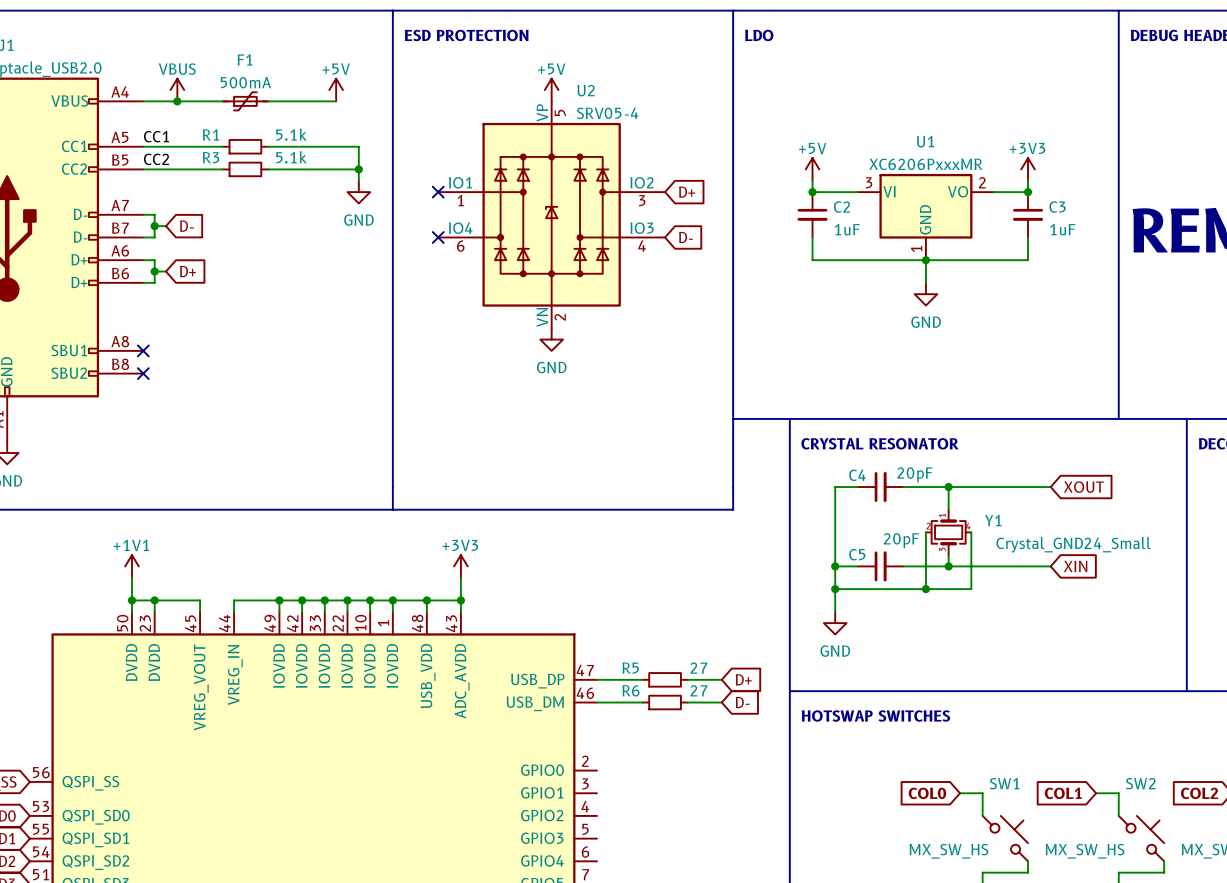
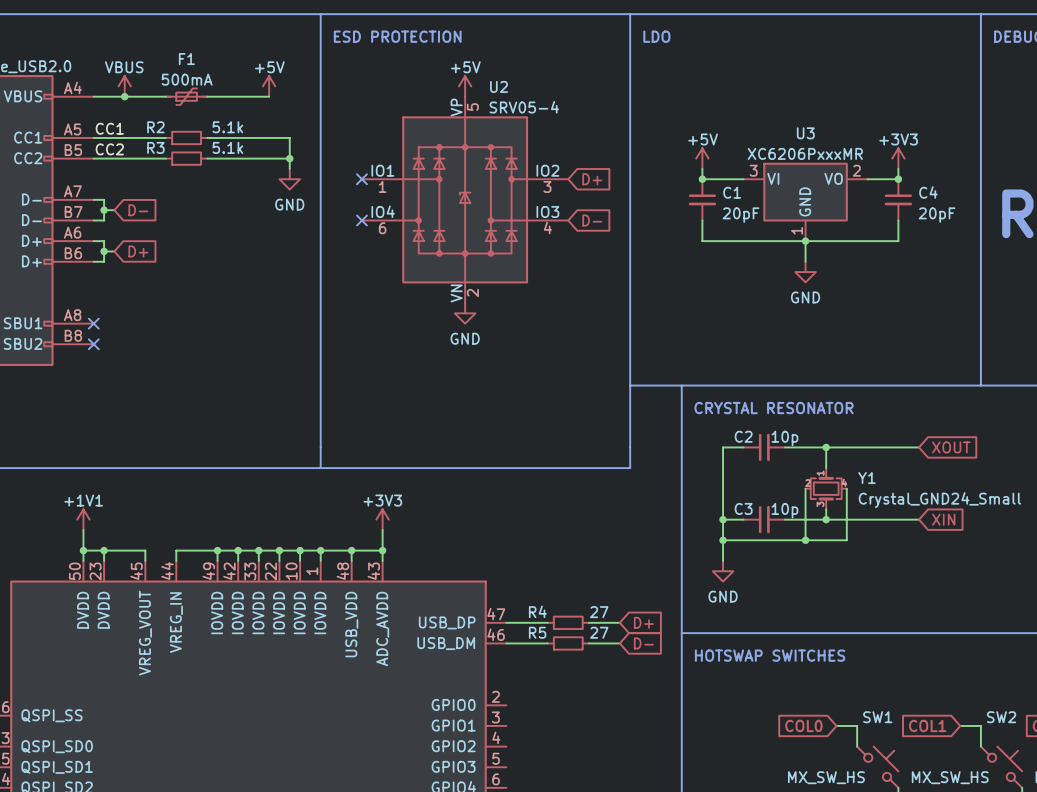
R1 name: R1 (211, 134) -> R2 (155, 127)
U1 name: U1 (925, 141) -> U3 (805, 133)
C2 name: C2 (842, 207) -> C1 (732, 192)
C3 name: C3 (1057, 207) -> C4 (928, 192)
C2 value: 1uF (847, 229) -> 20pF (741, 215)
C3 value: 1uF (1062, 229) -> 20pF (937, 215)
C4 value: 20pF (914, 474) -> 10p (784, 438)
C4 name: C4 (857, 475) -> C2 (743, 436)
C5 value: 20pF (901, 540) -> 10p (784, 510)
C5 name: C5 (857, 554) -> C3 (743, 508)
R5 name: R5 (630, 668) -> R4 (537, 611)
R6 name: R6 (630, 690) -> R5 (537, 632)

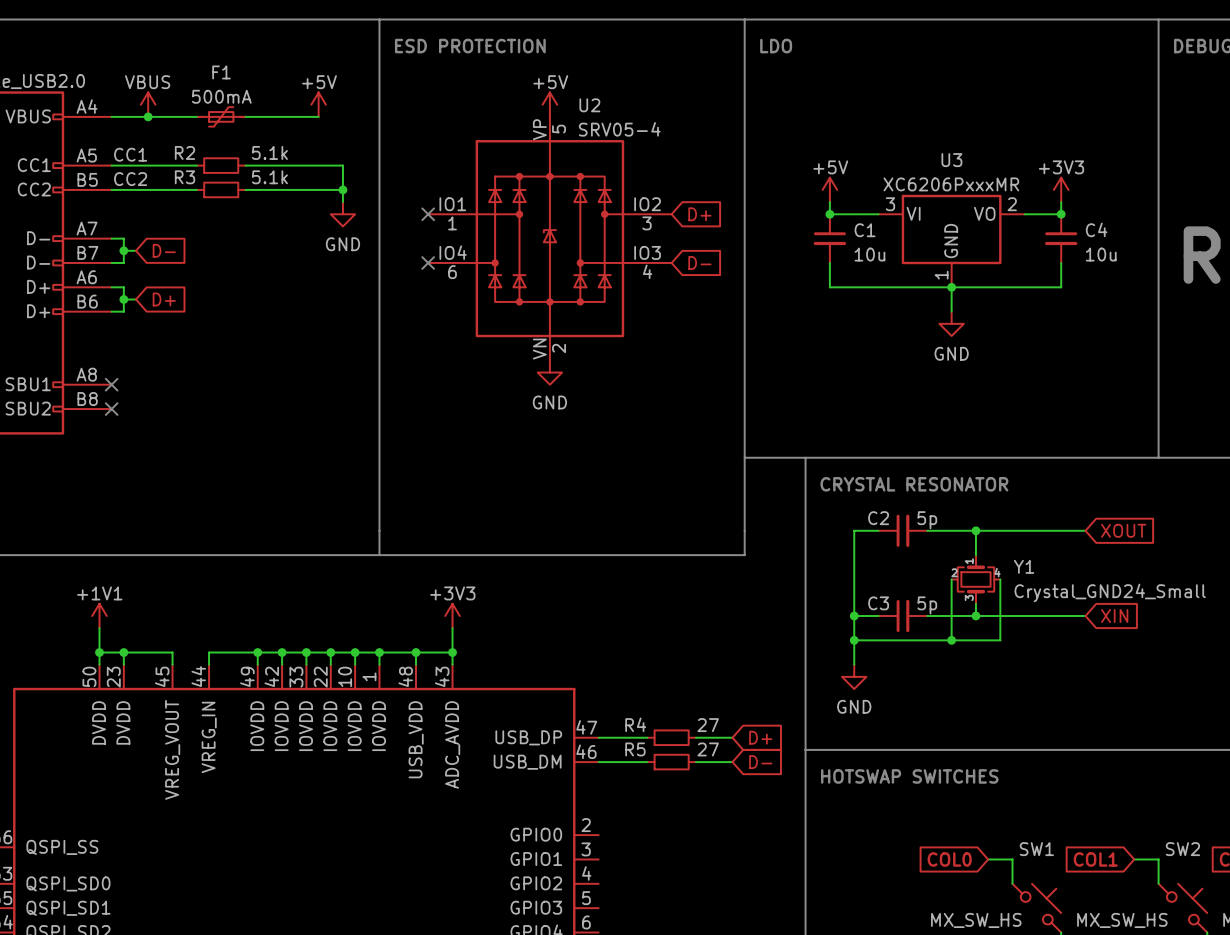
C1 value: 20pF (741, 215) -> 10u (869, 254)
C4 value: 20pF (937, 215) -> 10u (1101, 254)
C2 value: 10p (784, 438) -> 5p (927, 520)
C3 value: 10p (784, 510) -> 5p (927, 605)

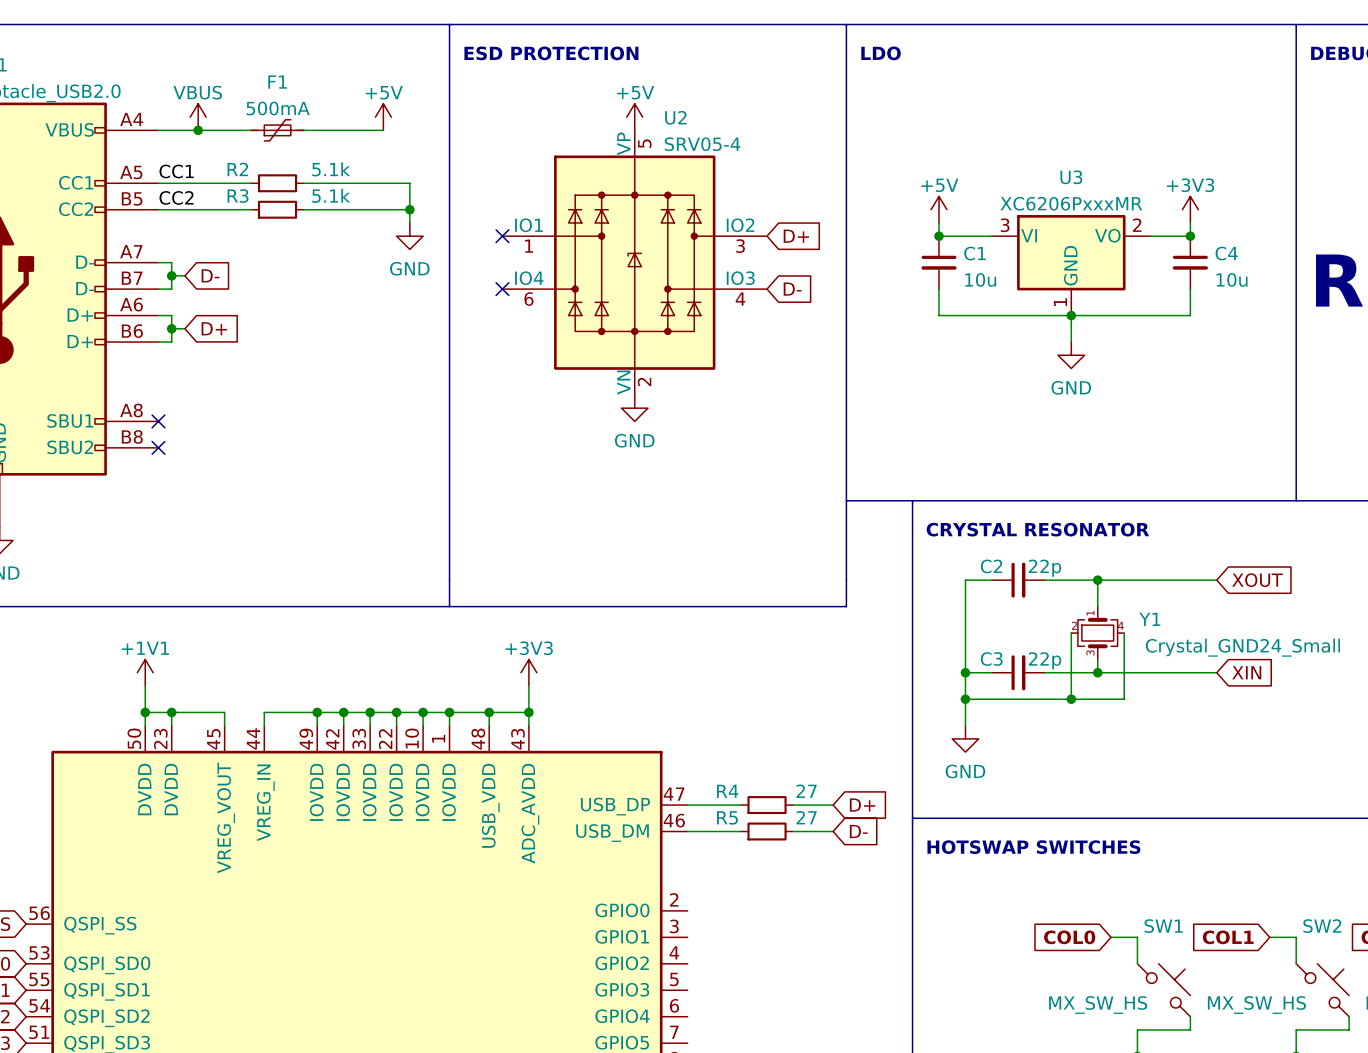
C2 value: 5p (927, 520) -> 22p (1045, 568)
C3 value: 5p (927, 605) -> 22p (1045, 660)

